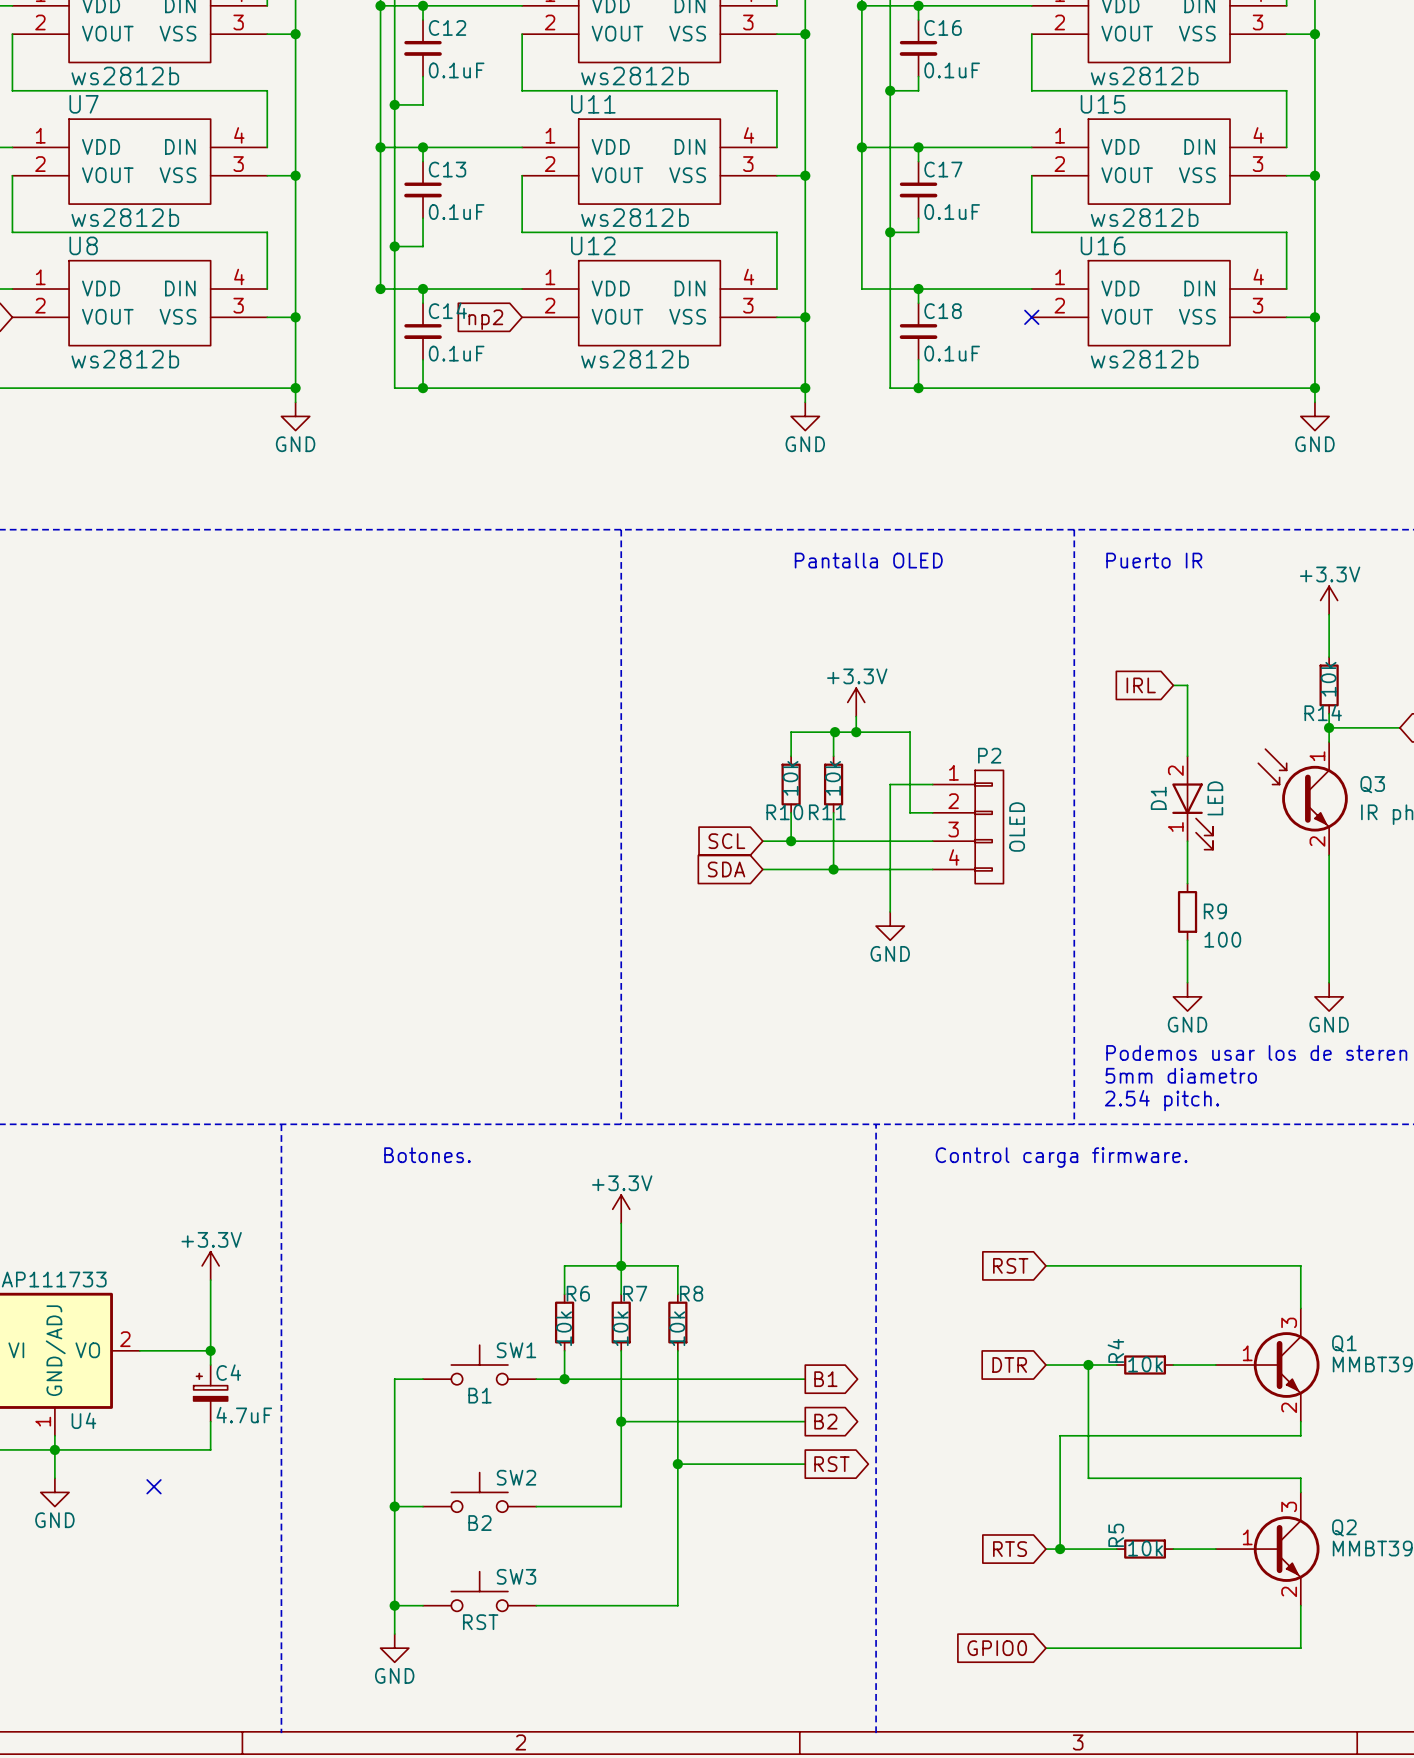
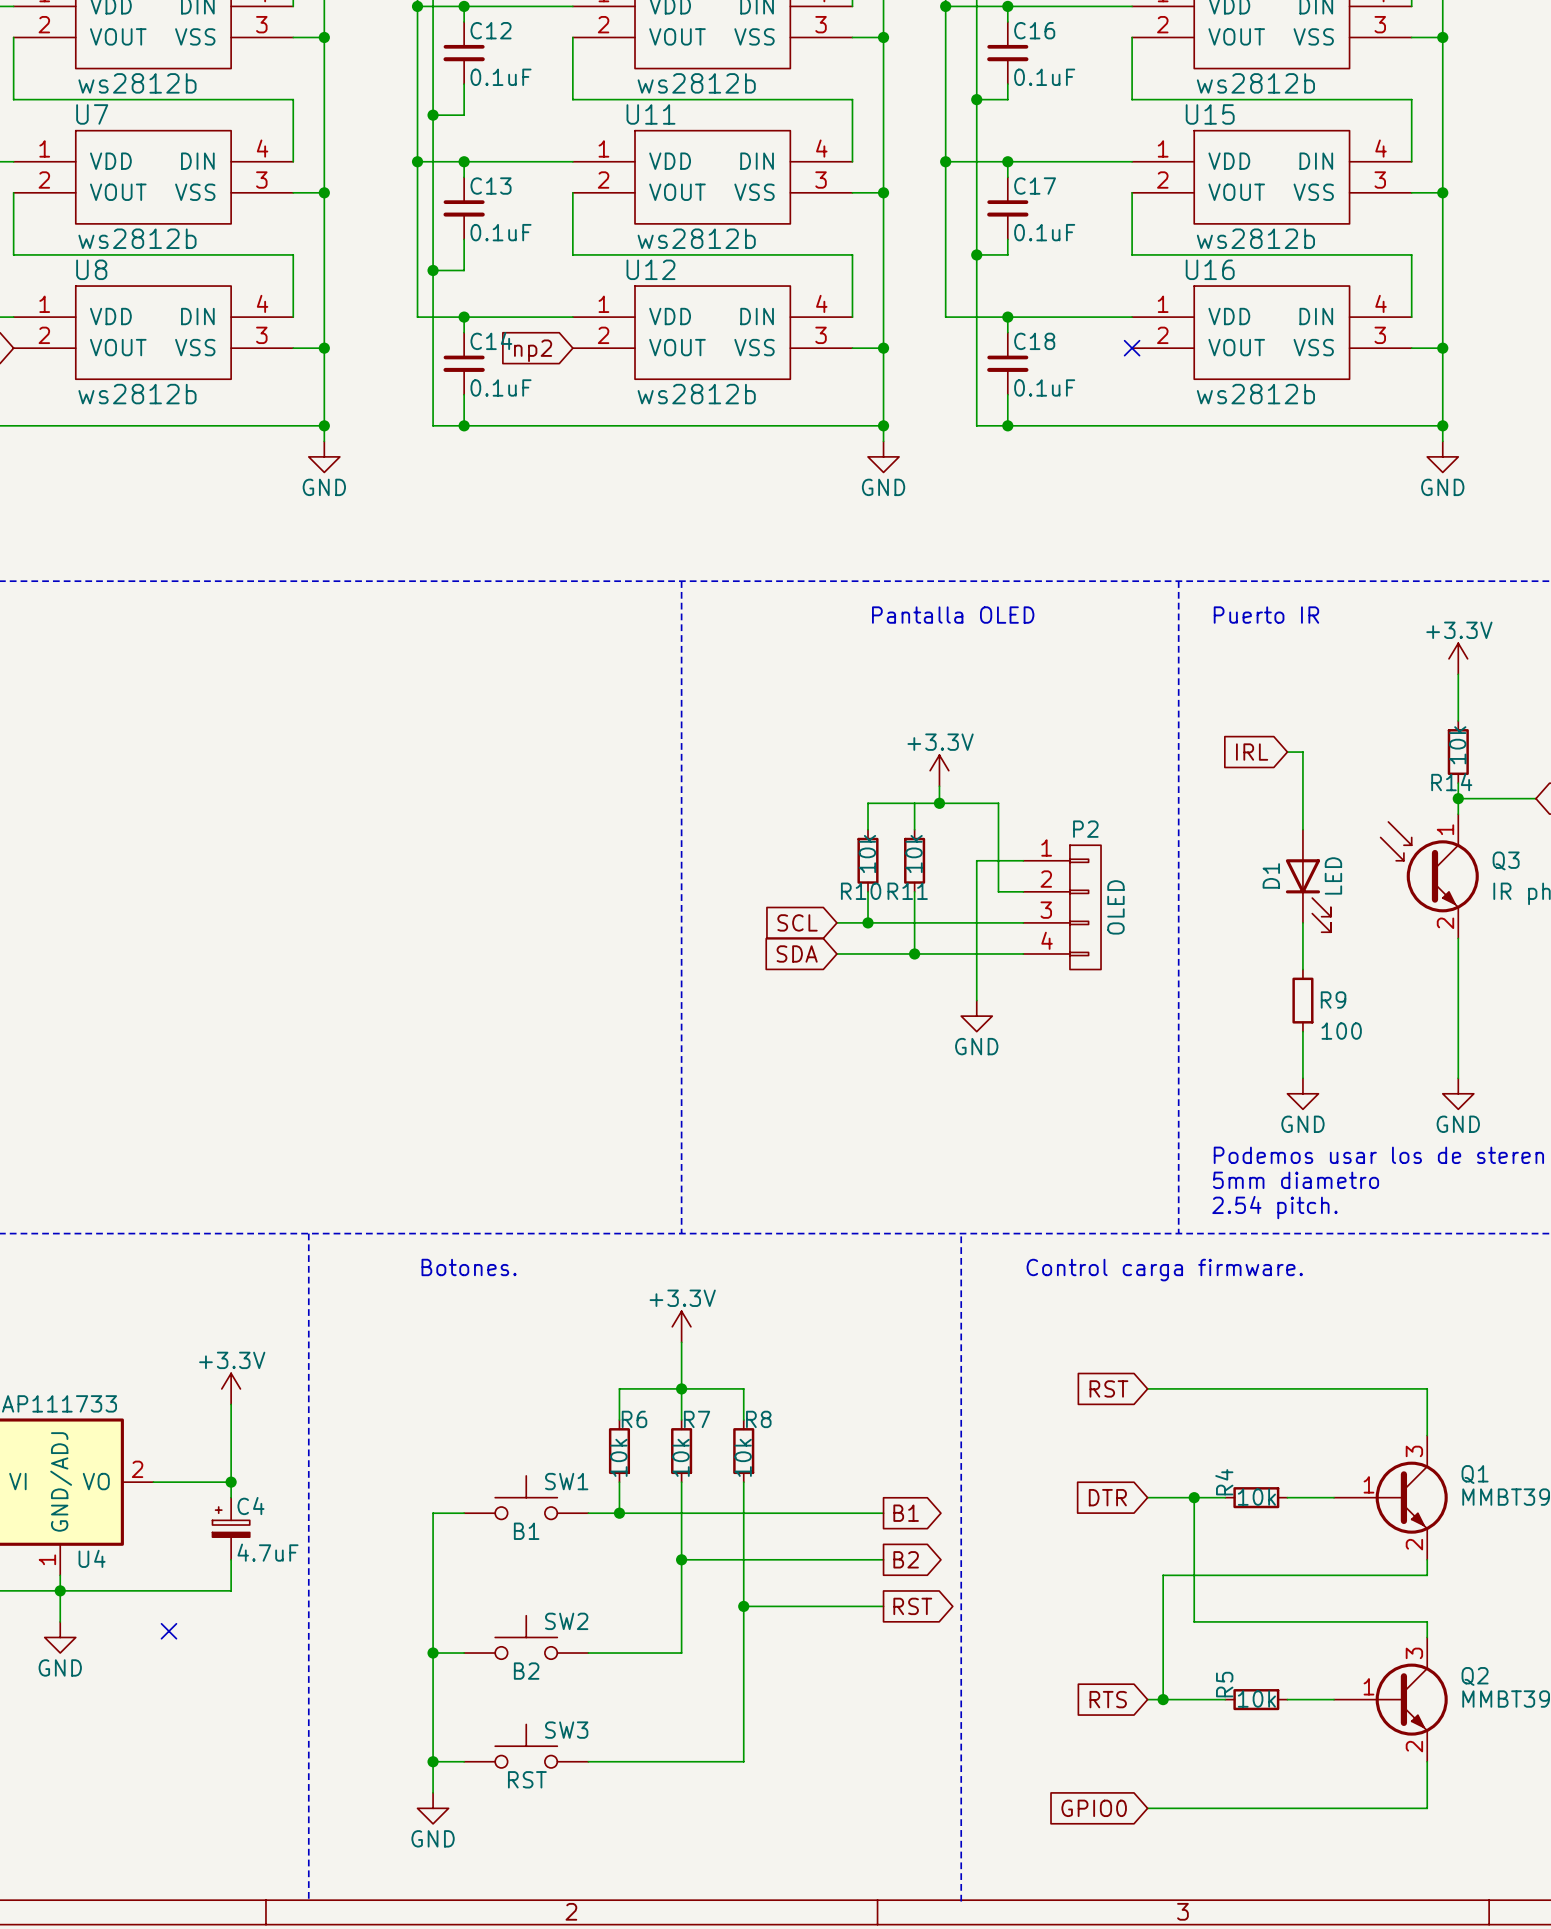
junction: (380, 289) -> none
junction: (835, 732) -> none
D1 symbol: [1172, 756, 1214, 850] -> [1285, 829, 1331, 933]

